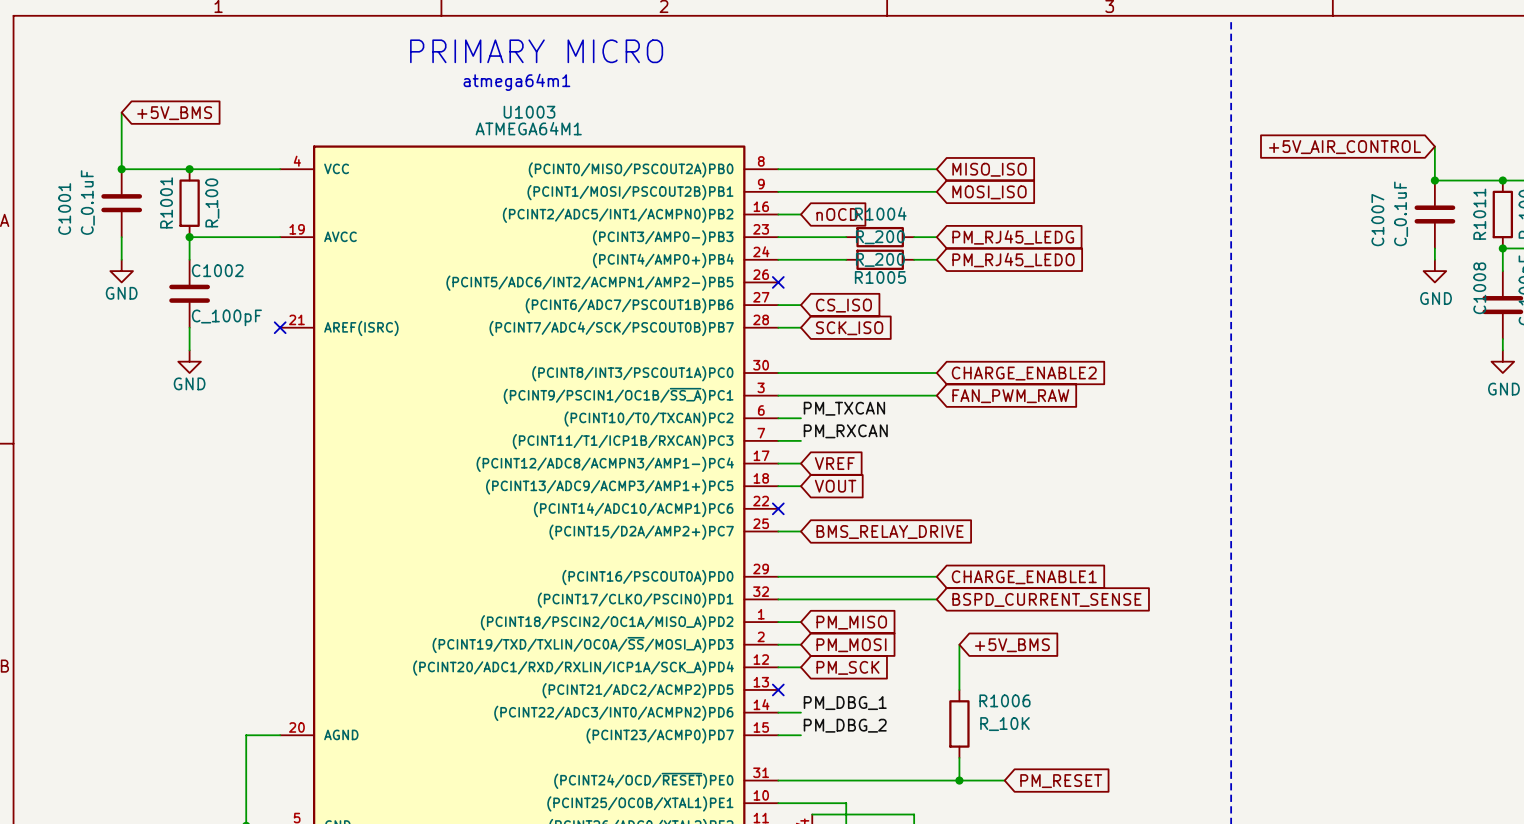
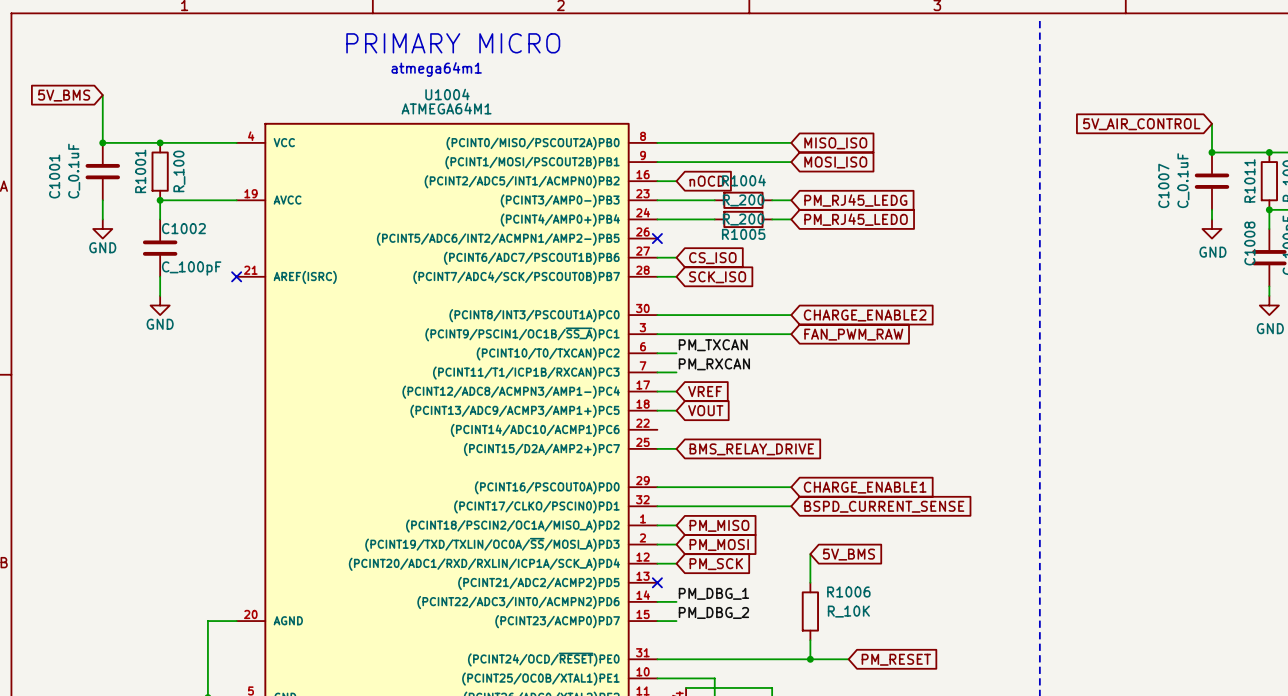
U1003 name: U1003 (529, 112) -> U1004 (447, 94)
global label: +5V_BMS (174, 113) -> 5V_BMS (64, 95)
global label: +5V_AIR_CONTROL (1344, 147) -> 5V_AIR_CONTROL (1141, 124)
no-connect mark: (778, 508) -> none
wire: (959, 644) (959, 656) -> none
global label: +5V_BMS (1012, 645) -> 5V_BMS (848, 554)

